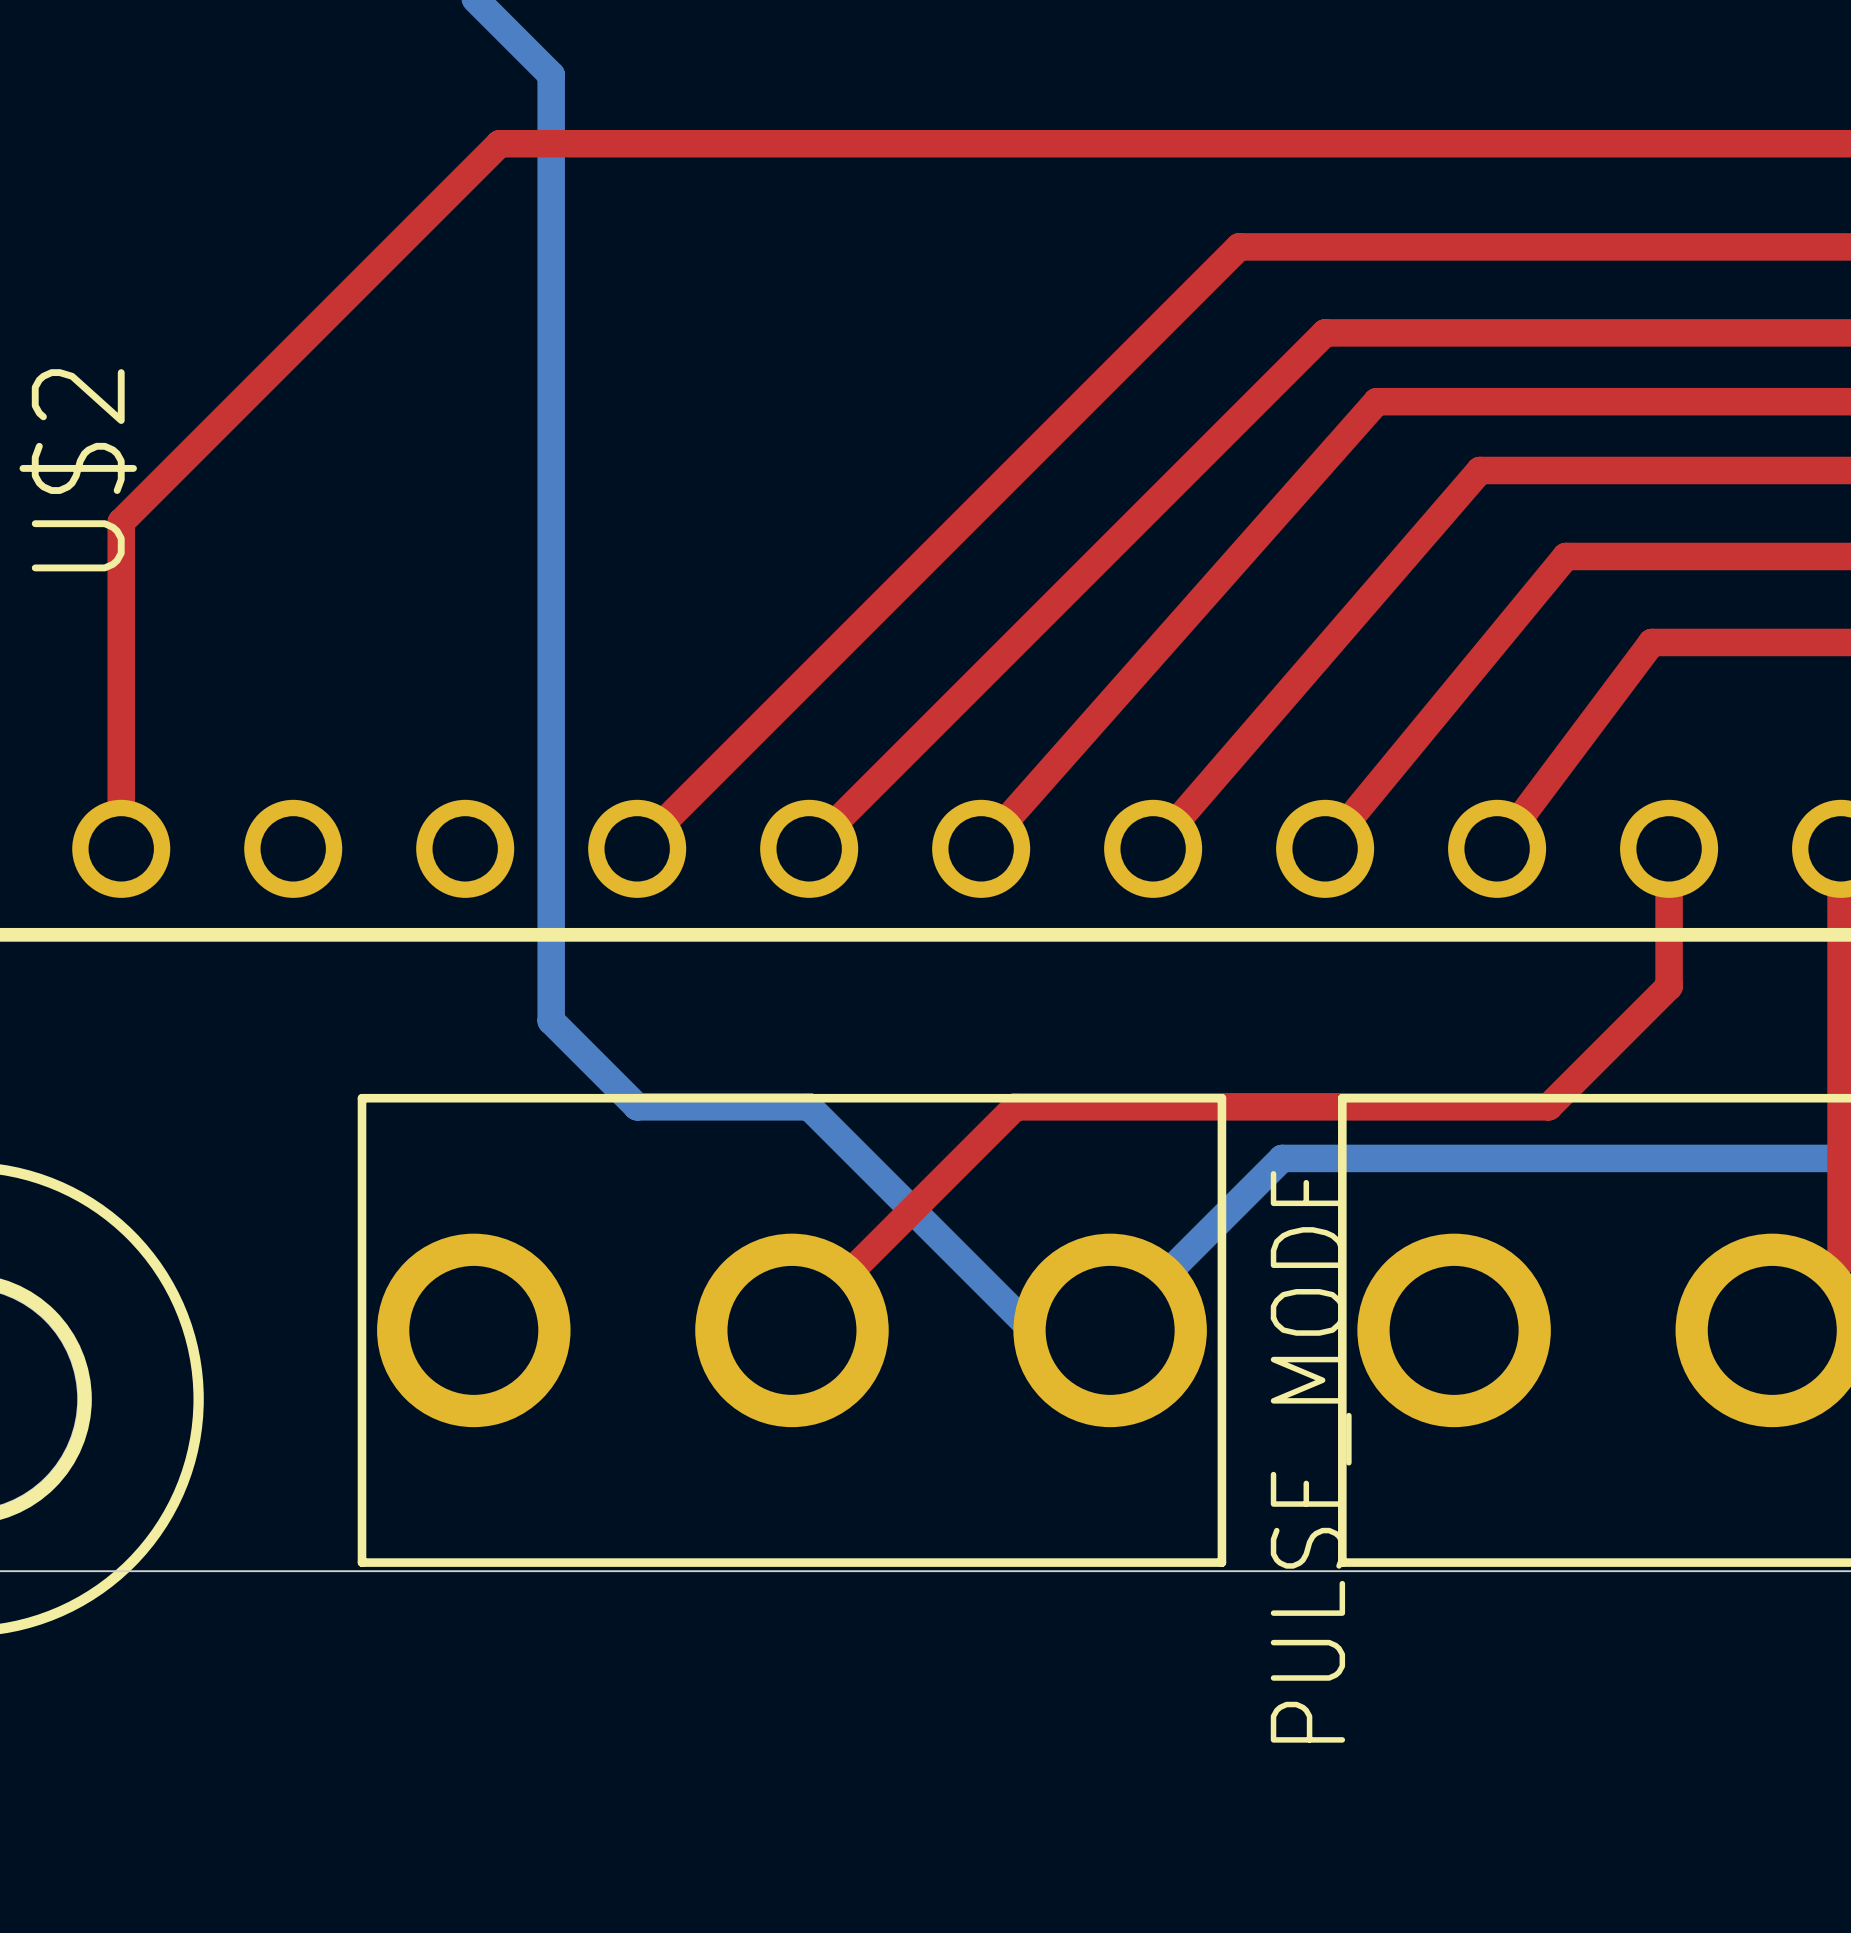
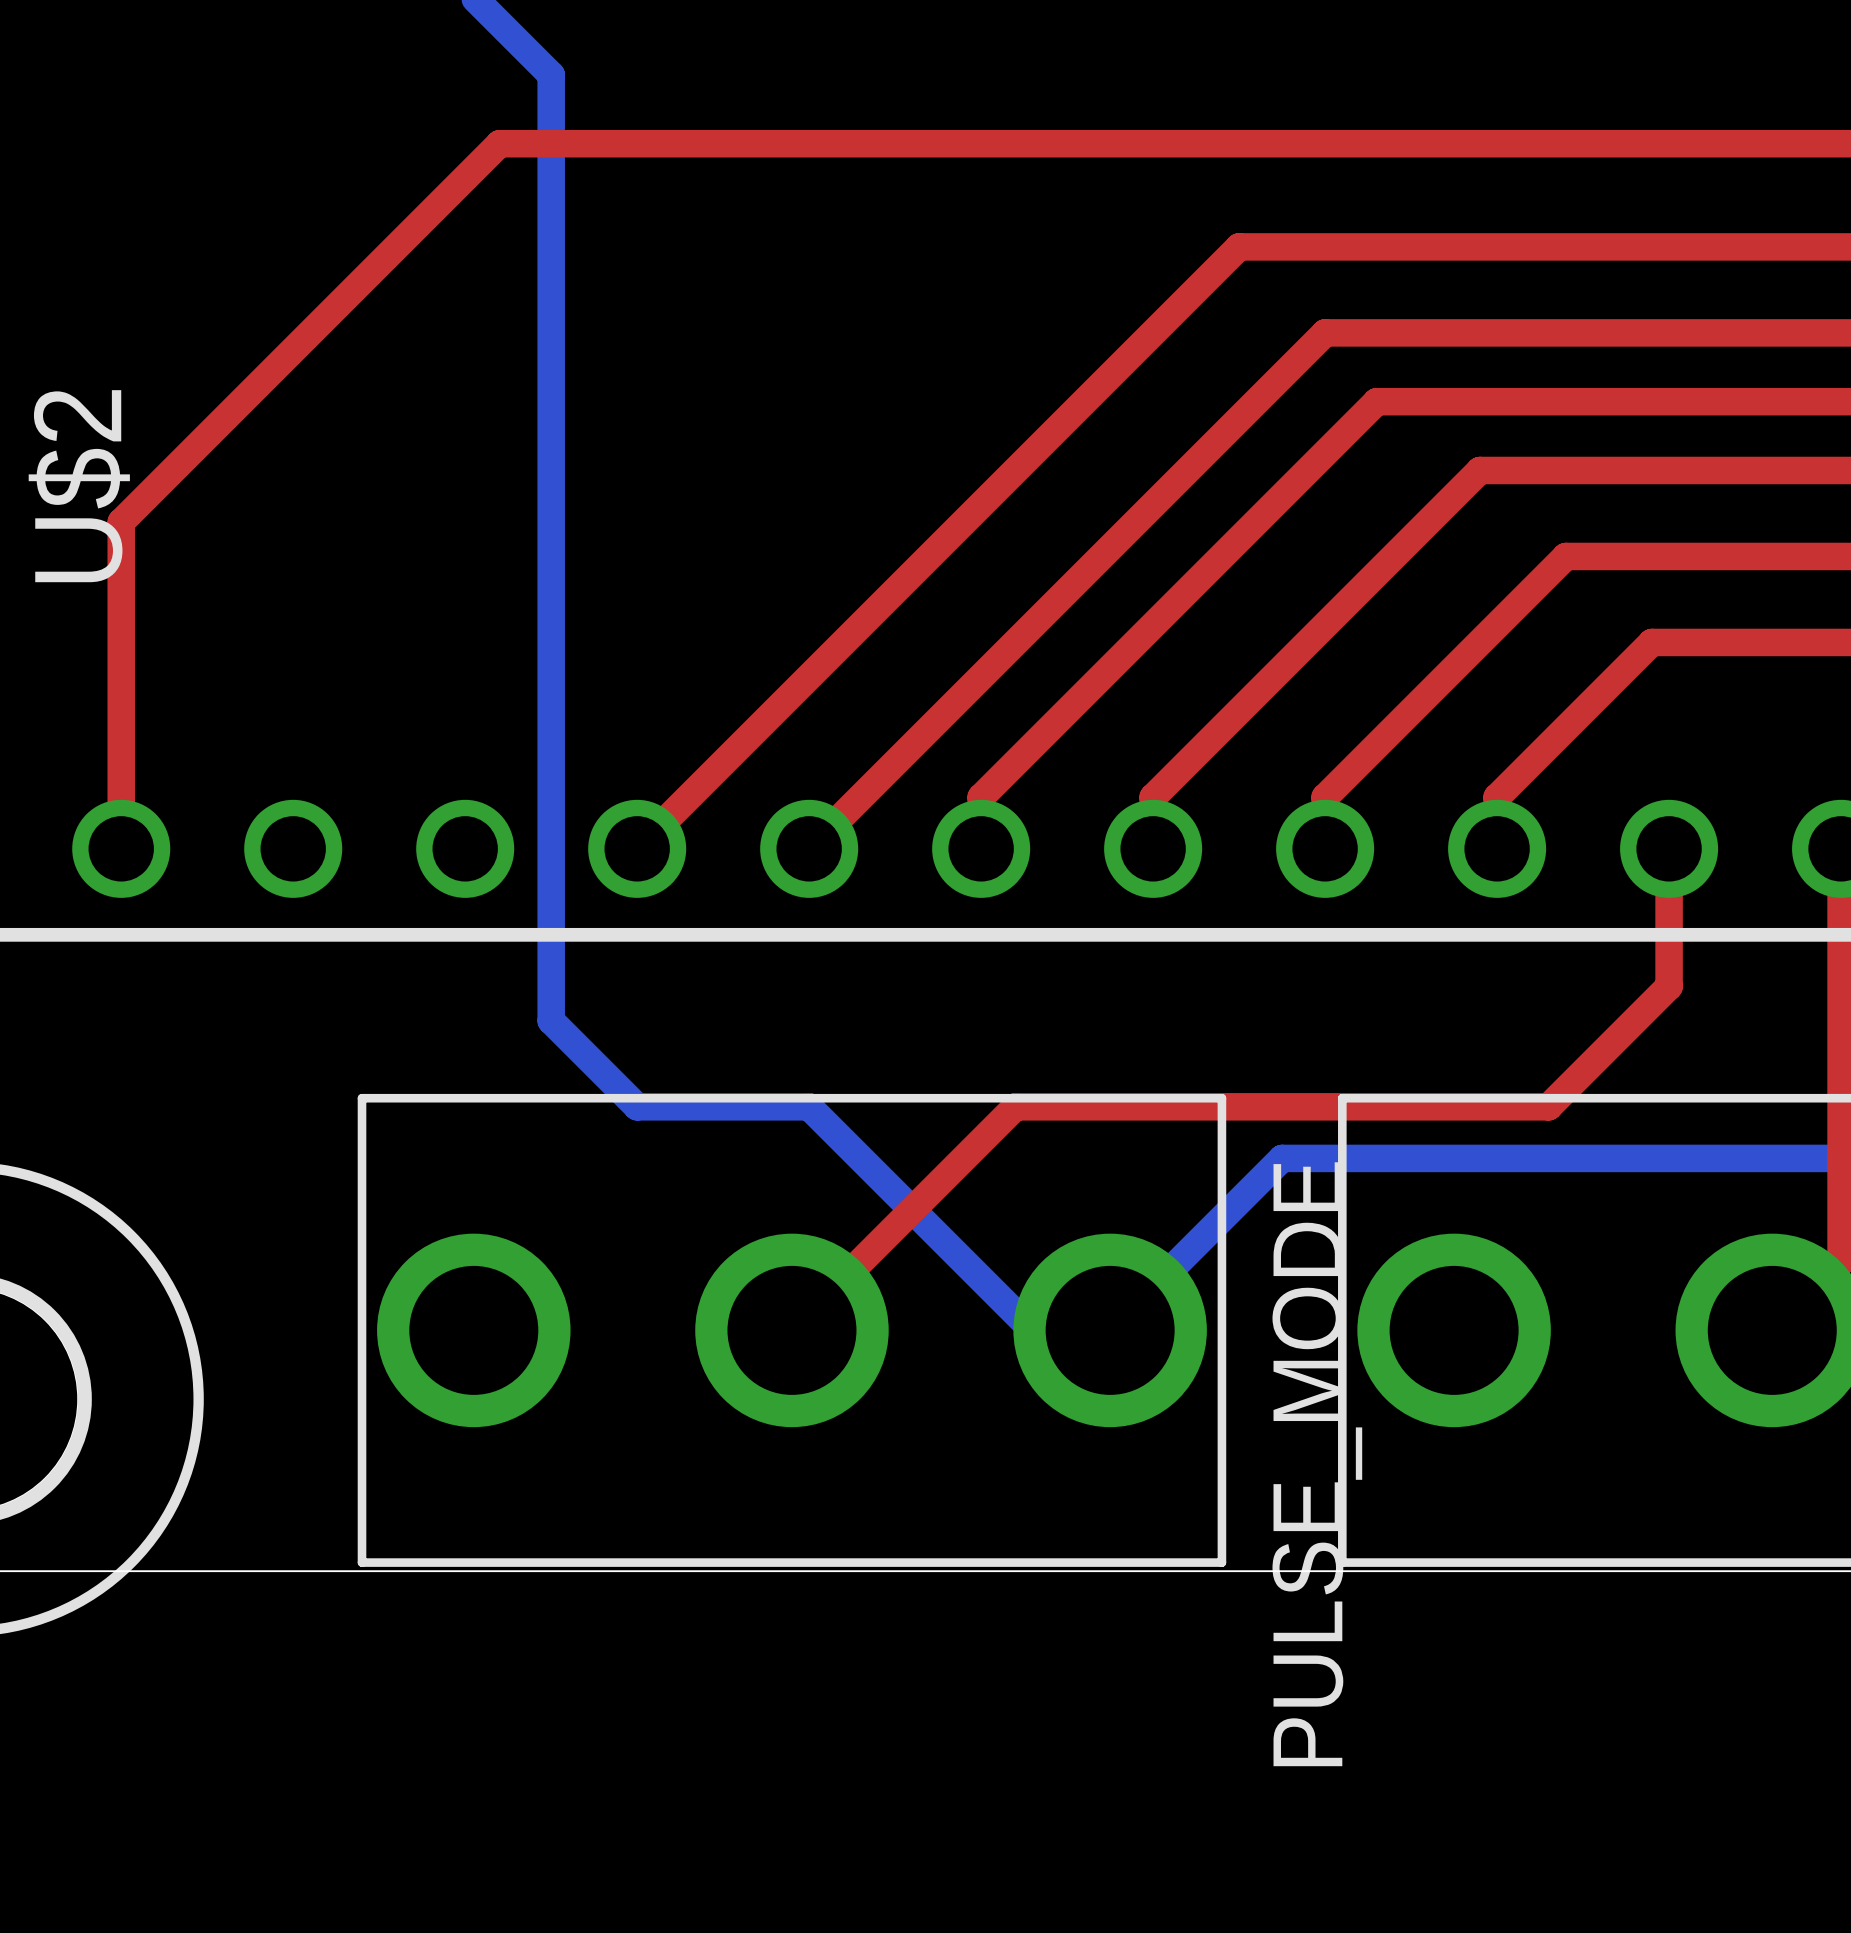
top track: (1376, 401) (981, 848) -> (1376, 401) (981, 797) (981, 848)
top track: (1479, 470) (1153, 848) -> (1479, 470) (1153, 797) (1153, 848)
top track: (1565, 556) (1325, 848) -> (1565, 556) (1325, 797) (1325, 848)
top track: (1651, 642) (1497, 848) -> (1651, 642) (1497, 797) (1497, 848)

